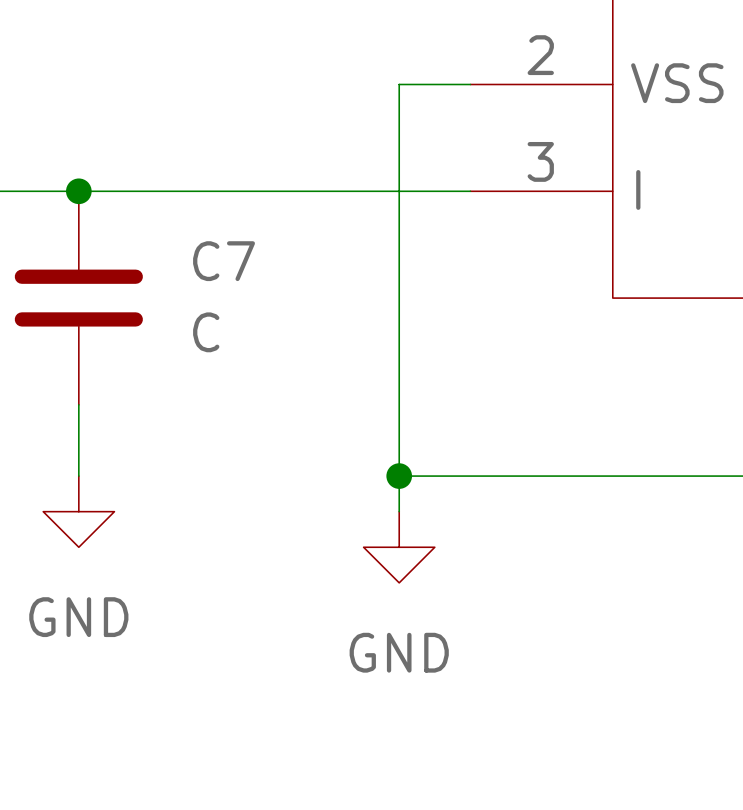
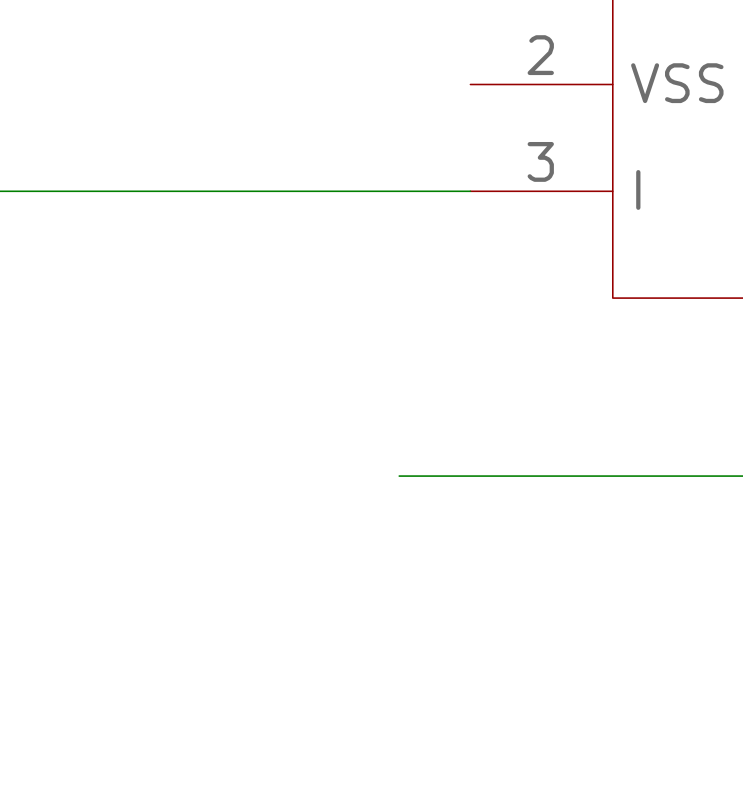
wire: (470, 84) (399, 84) (399, 511) -> none
junction: (78, 191) -> none
C7: C (78, 298) -> none
wire: (78, 404) (78, 476) -> none
junction: (399, 476) -> none
power symbol: GND (78, 511) -> none
power symbol: GND (399, 547) -> none

